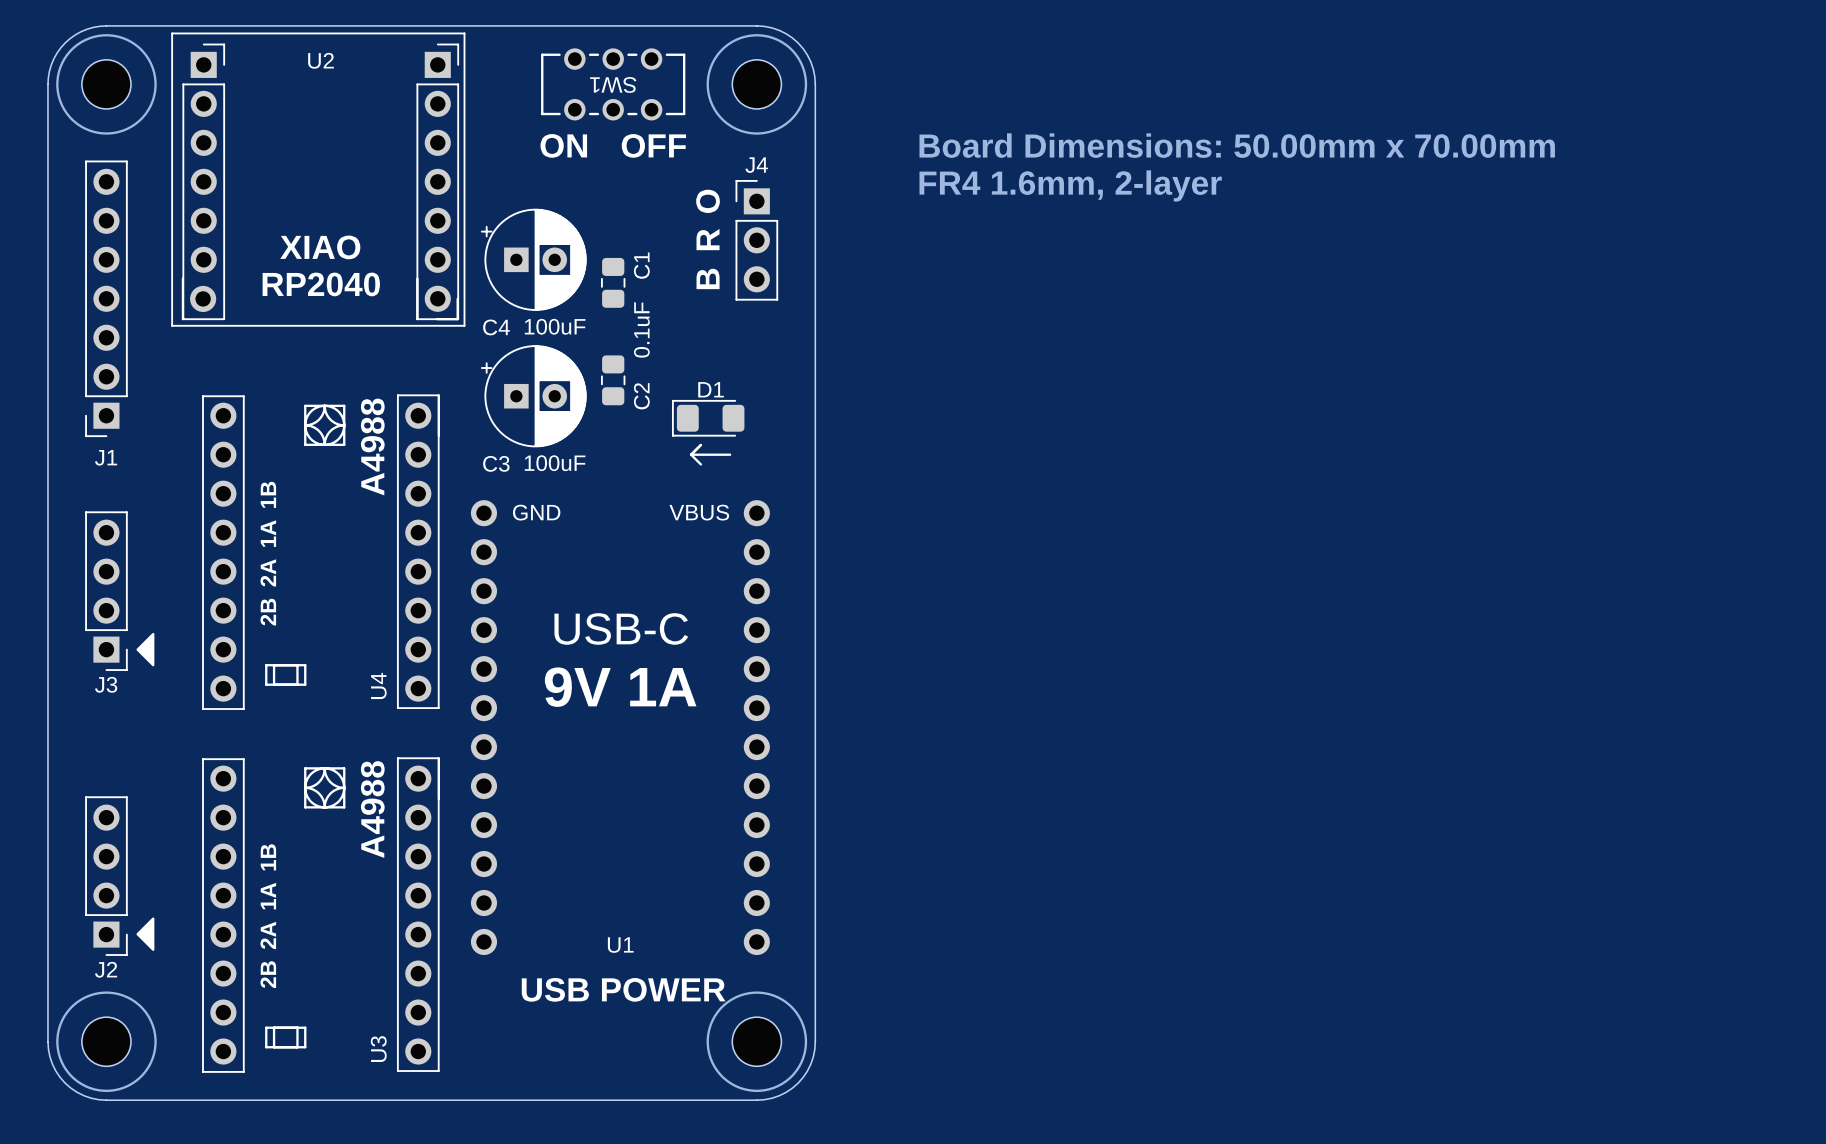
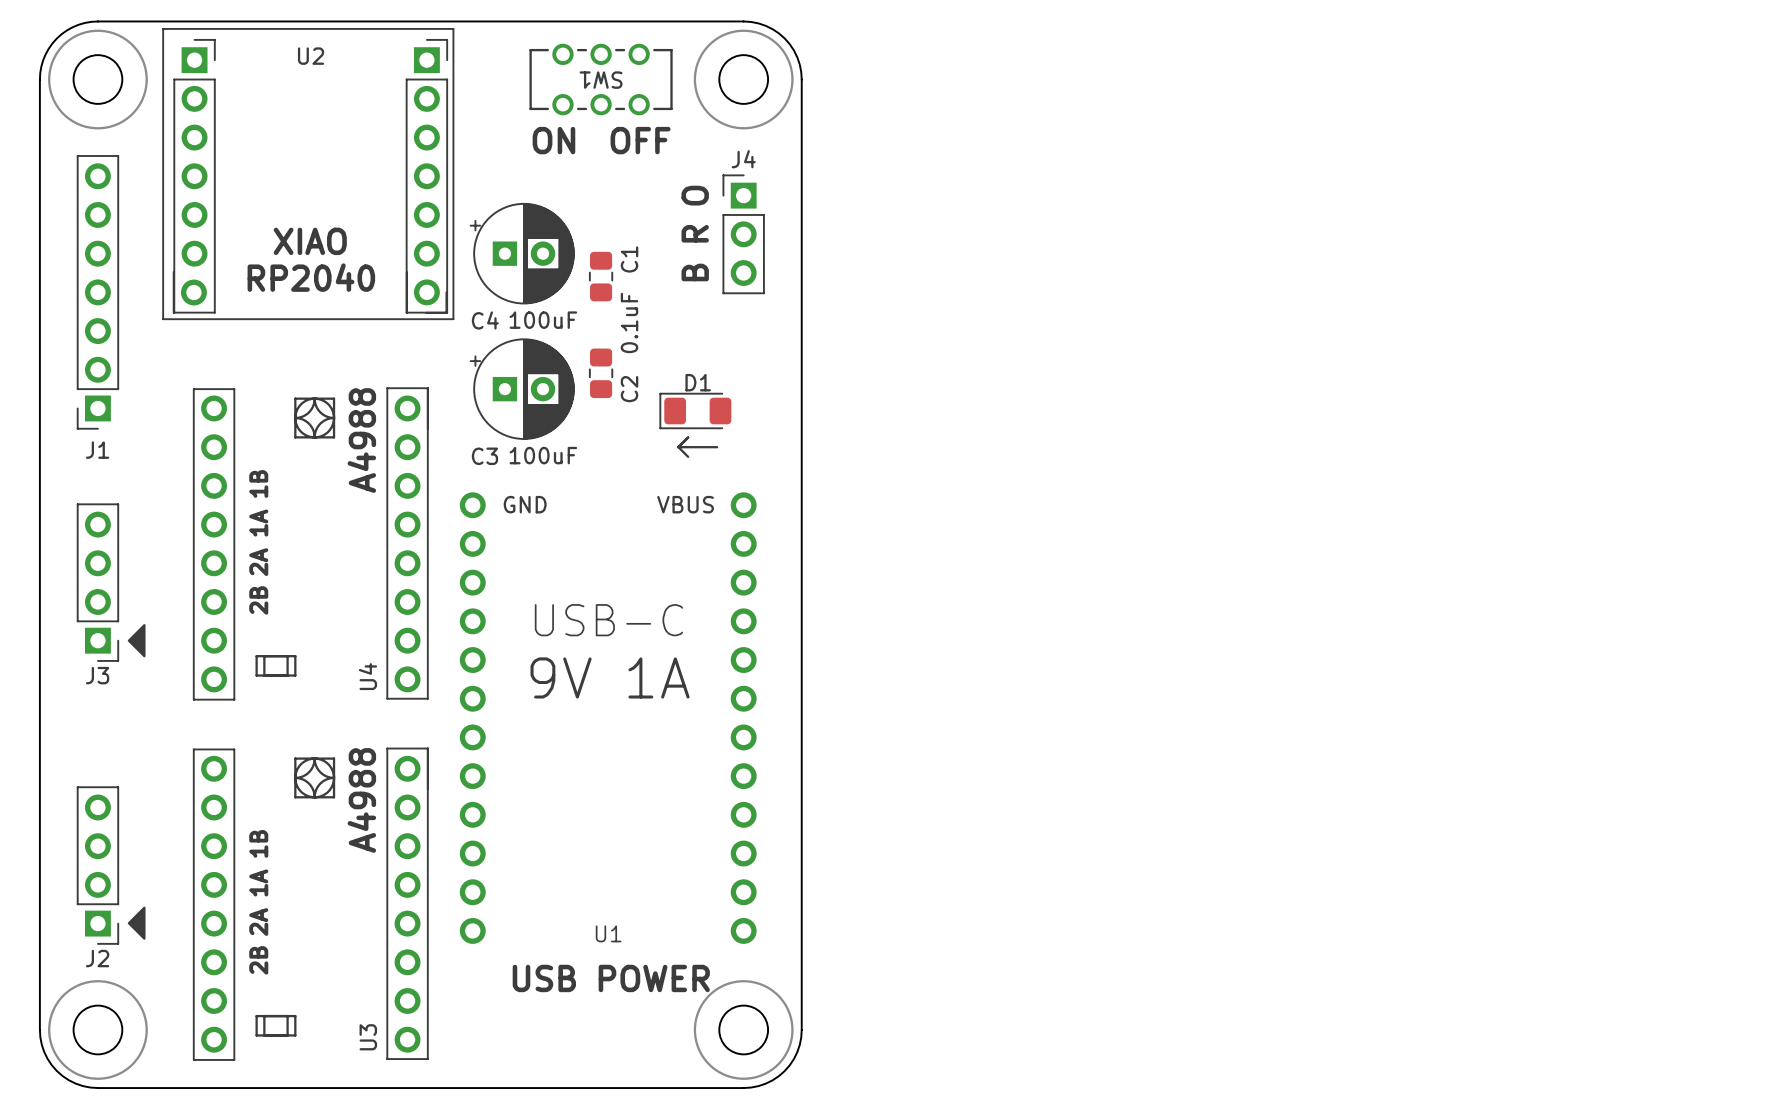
text: Board Dimensions: 50.00mm x 70.00mm (1237, 145) -> none
text: FR4 1.6mm, 2-layer (1070, 185) -> none

